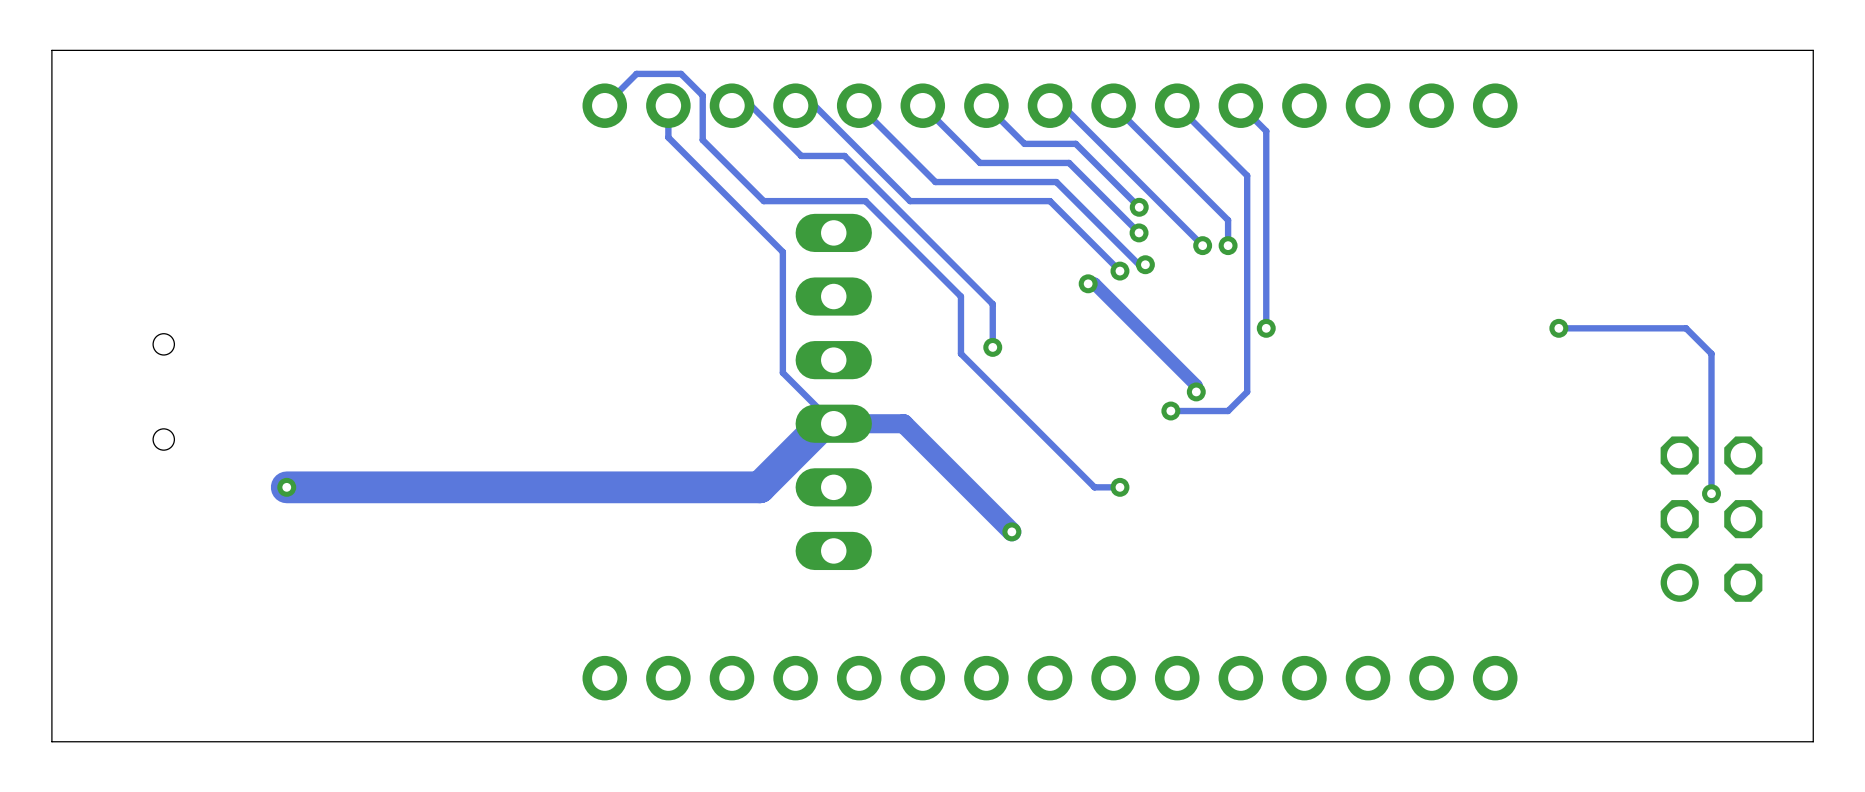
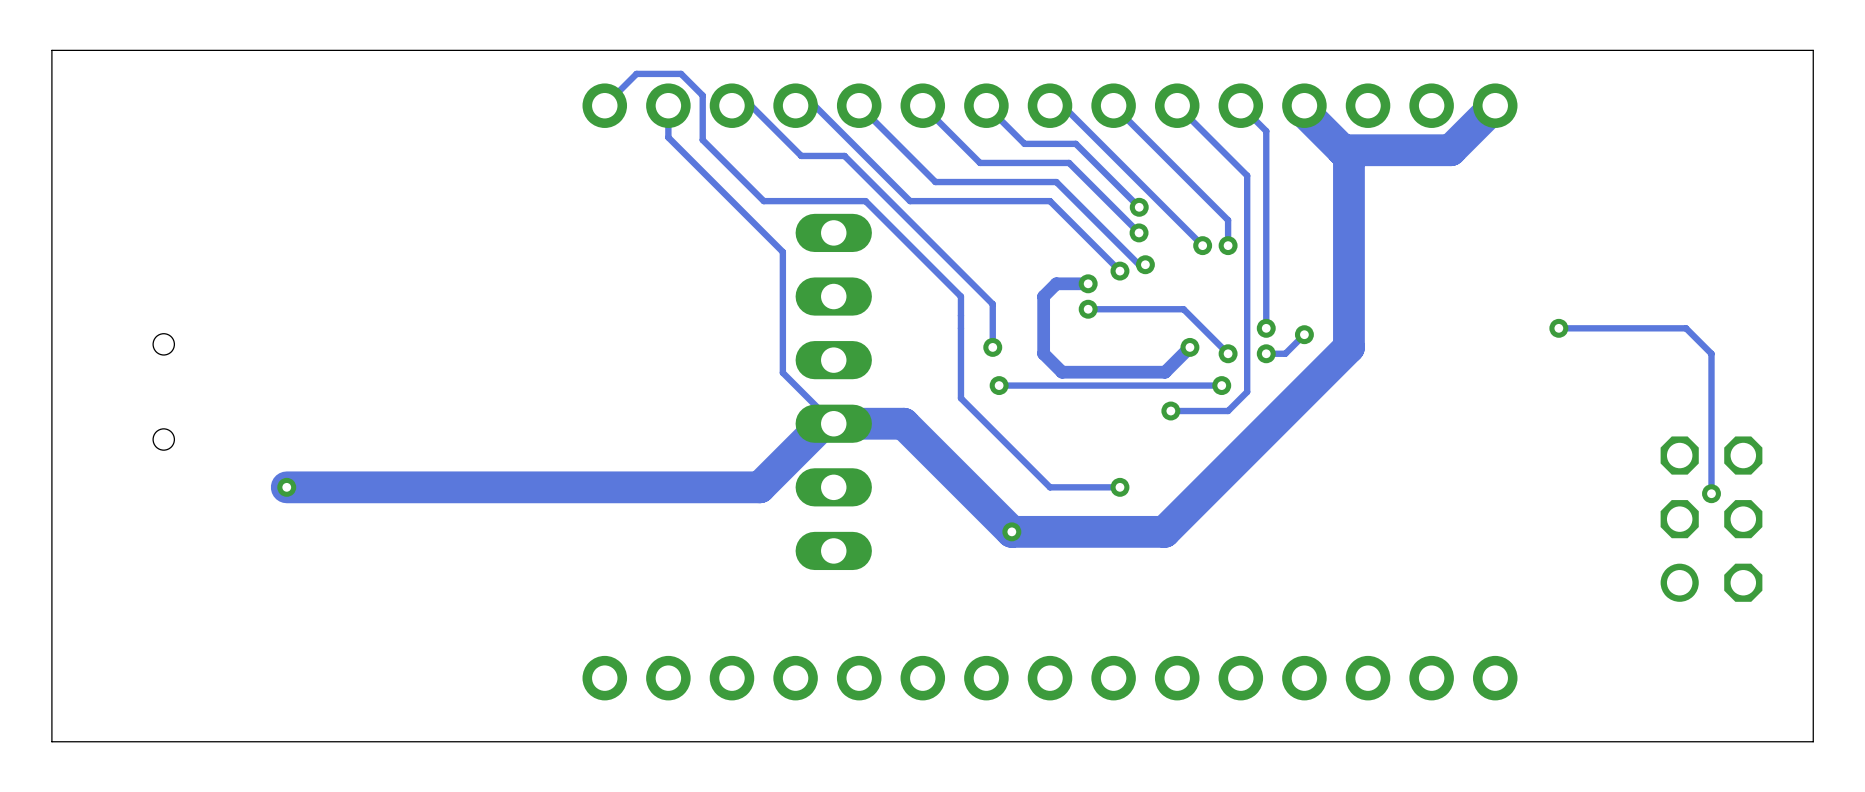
track: none -> (1304, 105) (1304, 112) (1348, 156) (1348, 347) (1164, 531) (1011, 531)
track: none -> (1495, 105) (1450, 150) (1342, 150)
track: (1088, 283) (1094, 283) (1196, 385) (1196, 391) -> (1088, 283) (1056, 283) (1043, 296) (1043, 353) (1062, 372) (1165, 372) (1189, 347)
track: none -> (1088, 309) (1183, 309) (1228, 353)
via: none -> (1088, 309)
track: none -> (1304, 334) (1285, 353) (1266, 353)
via: none -> (1304, 334)
via: none -> (1189, 347)
track: (960, 353) (1094, 487) -> (960, 353) (960, 398) (1050, 487) (1094, 487)
via: none -> (1228, 353)
via: none -> (1266, 353)
via: none -> (999, 385)
track: none -> (1221, 385) (999, 385)
via: none -> (1221, 385)
via: (1196, 391) -> none
track width: thin (833, 423) (903, 423) (1011, 531) -> thick (833, 423) (903, 423) (1011, 531)

